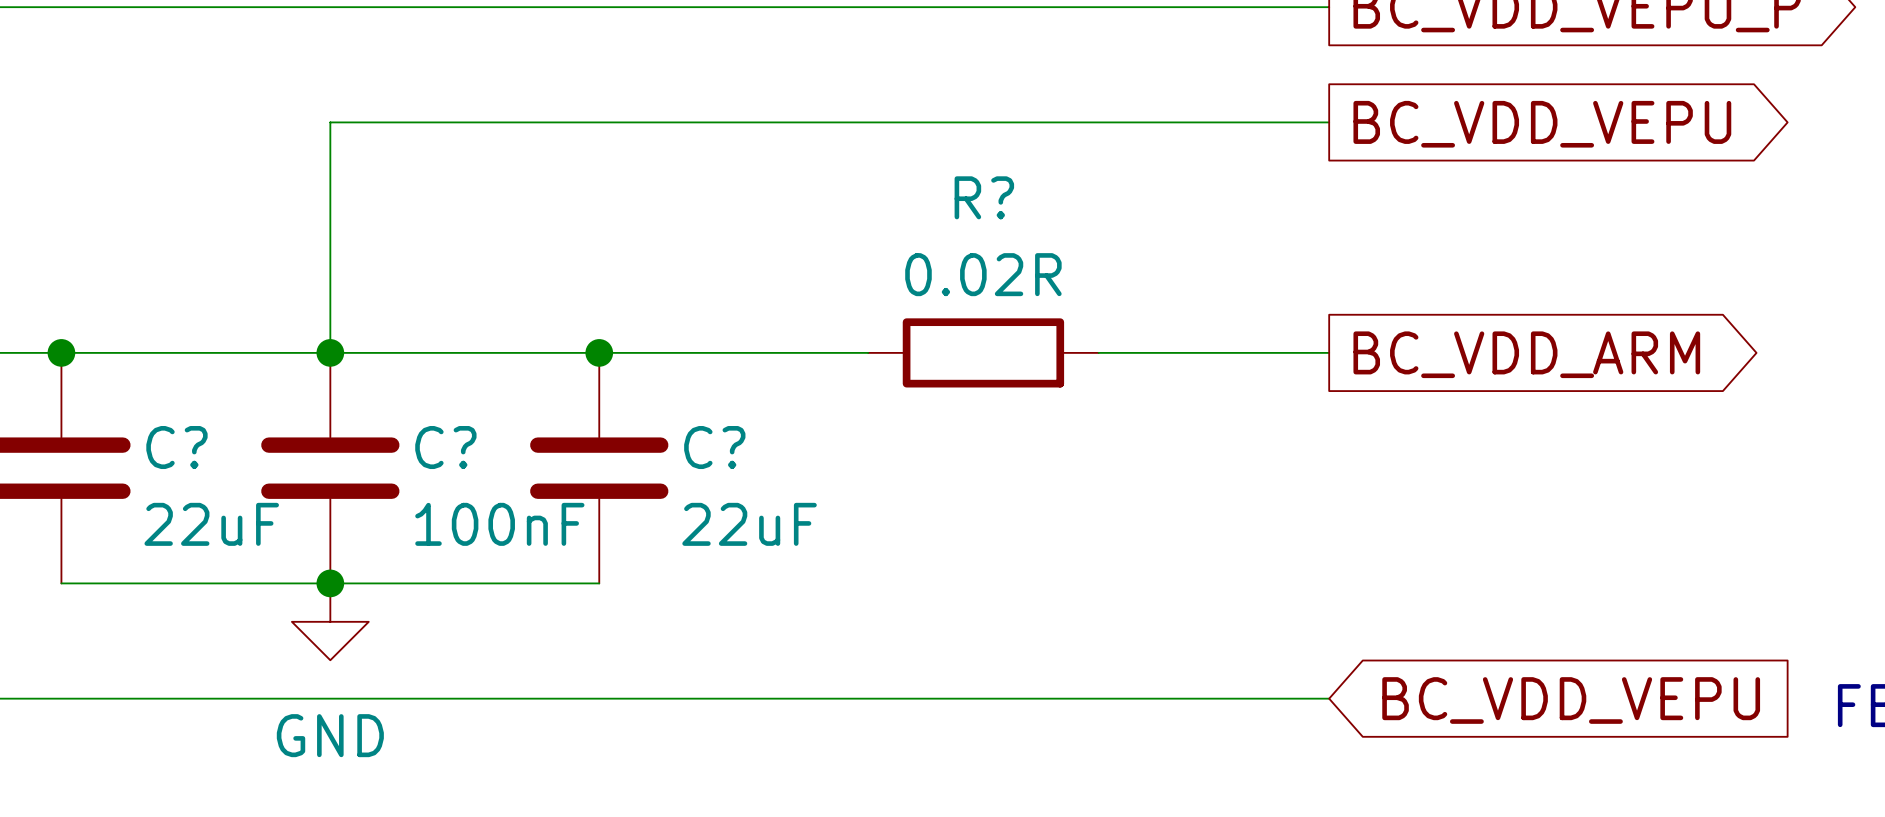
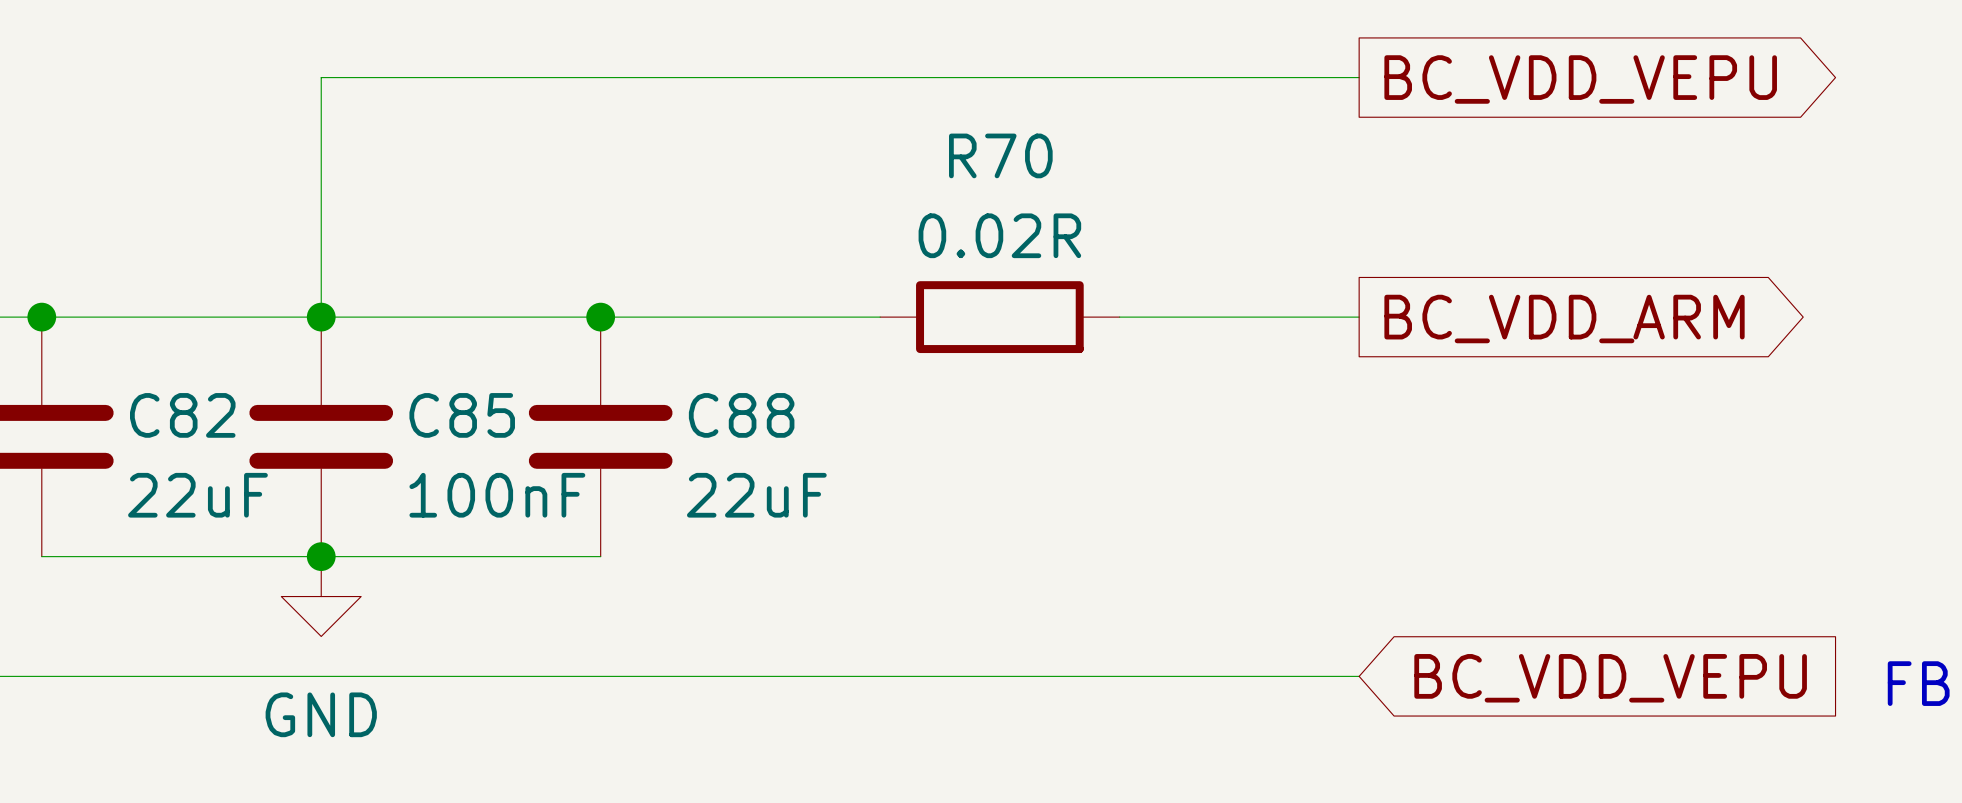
R? name: R? (984, 197) -> R70 (1000, 155)
C? name: C? (176, 447) -> C82 (182, 415)
C? name: C? (445, 447) -> C85 (462, 415)
C? name: C? (714, 447) -> C88 (741, 415)

